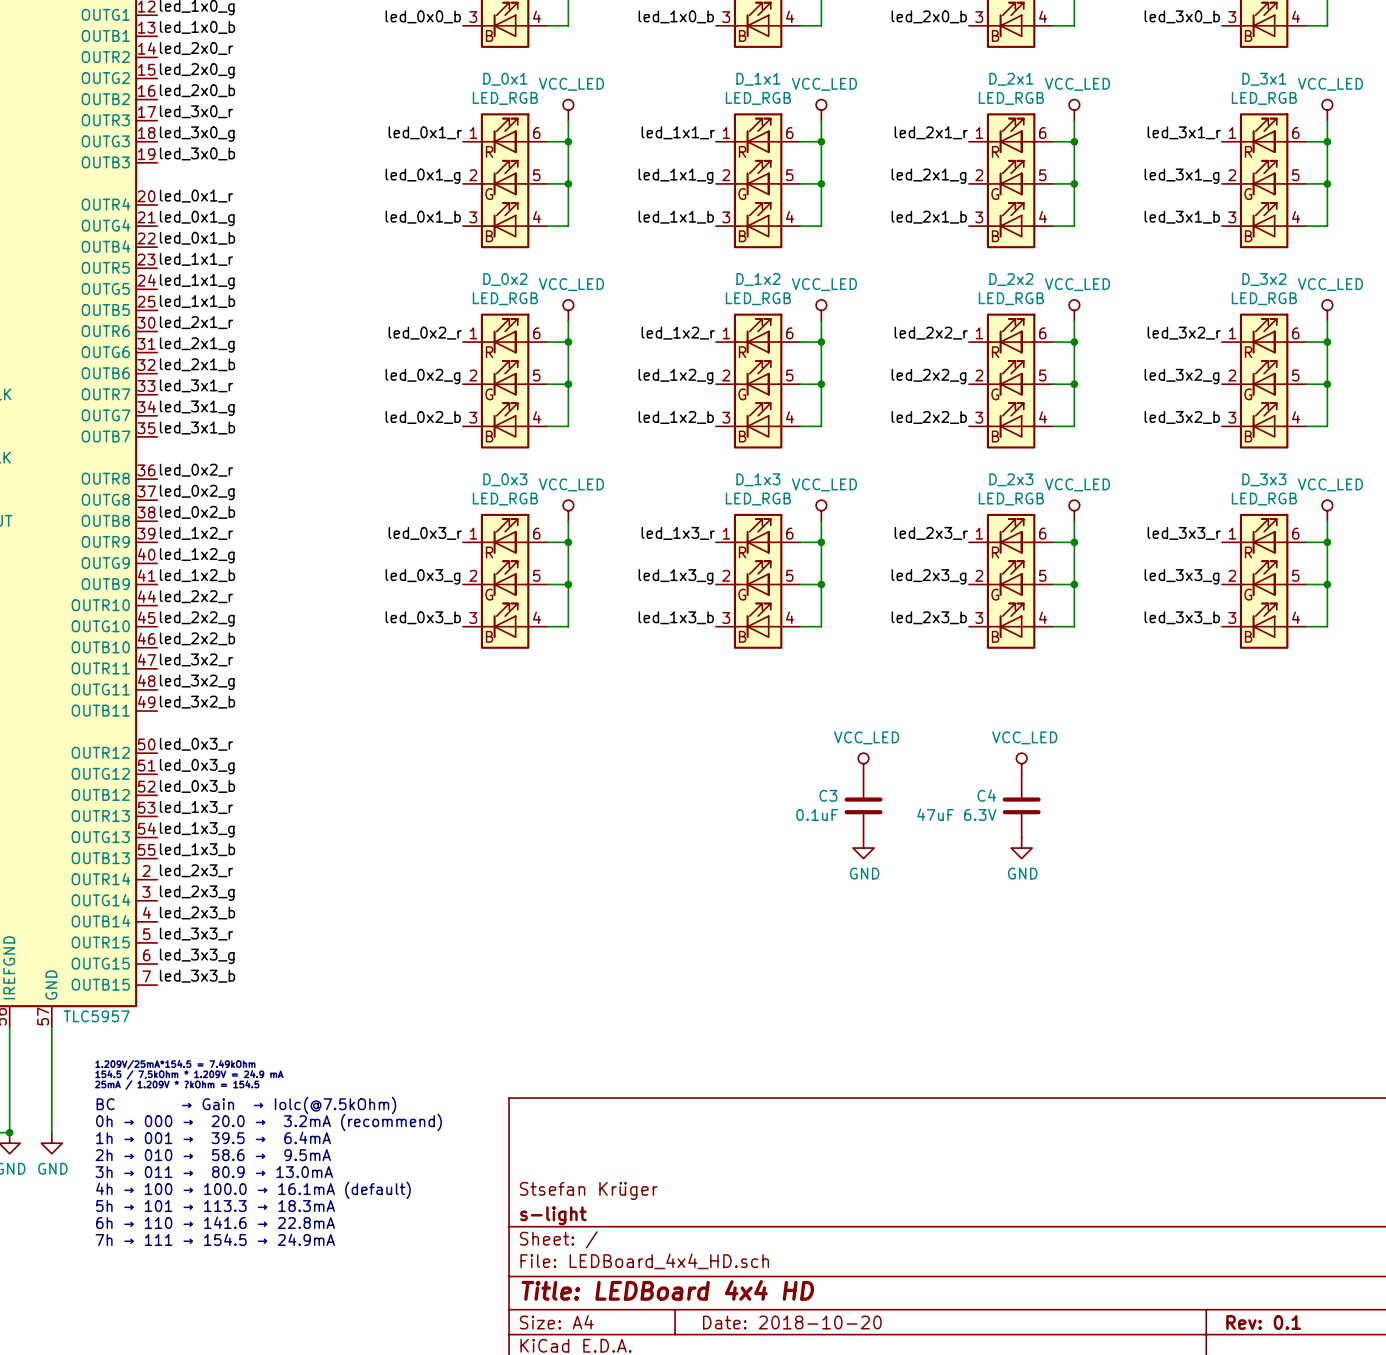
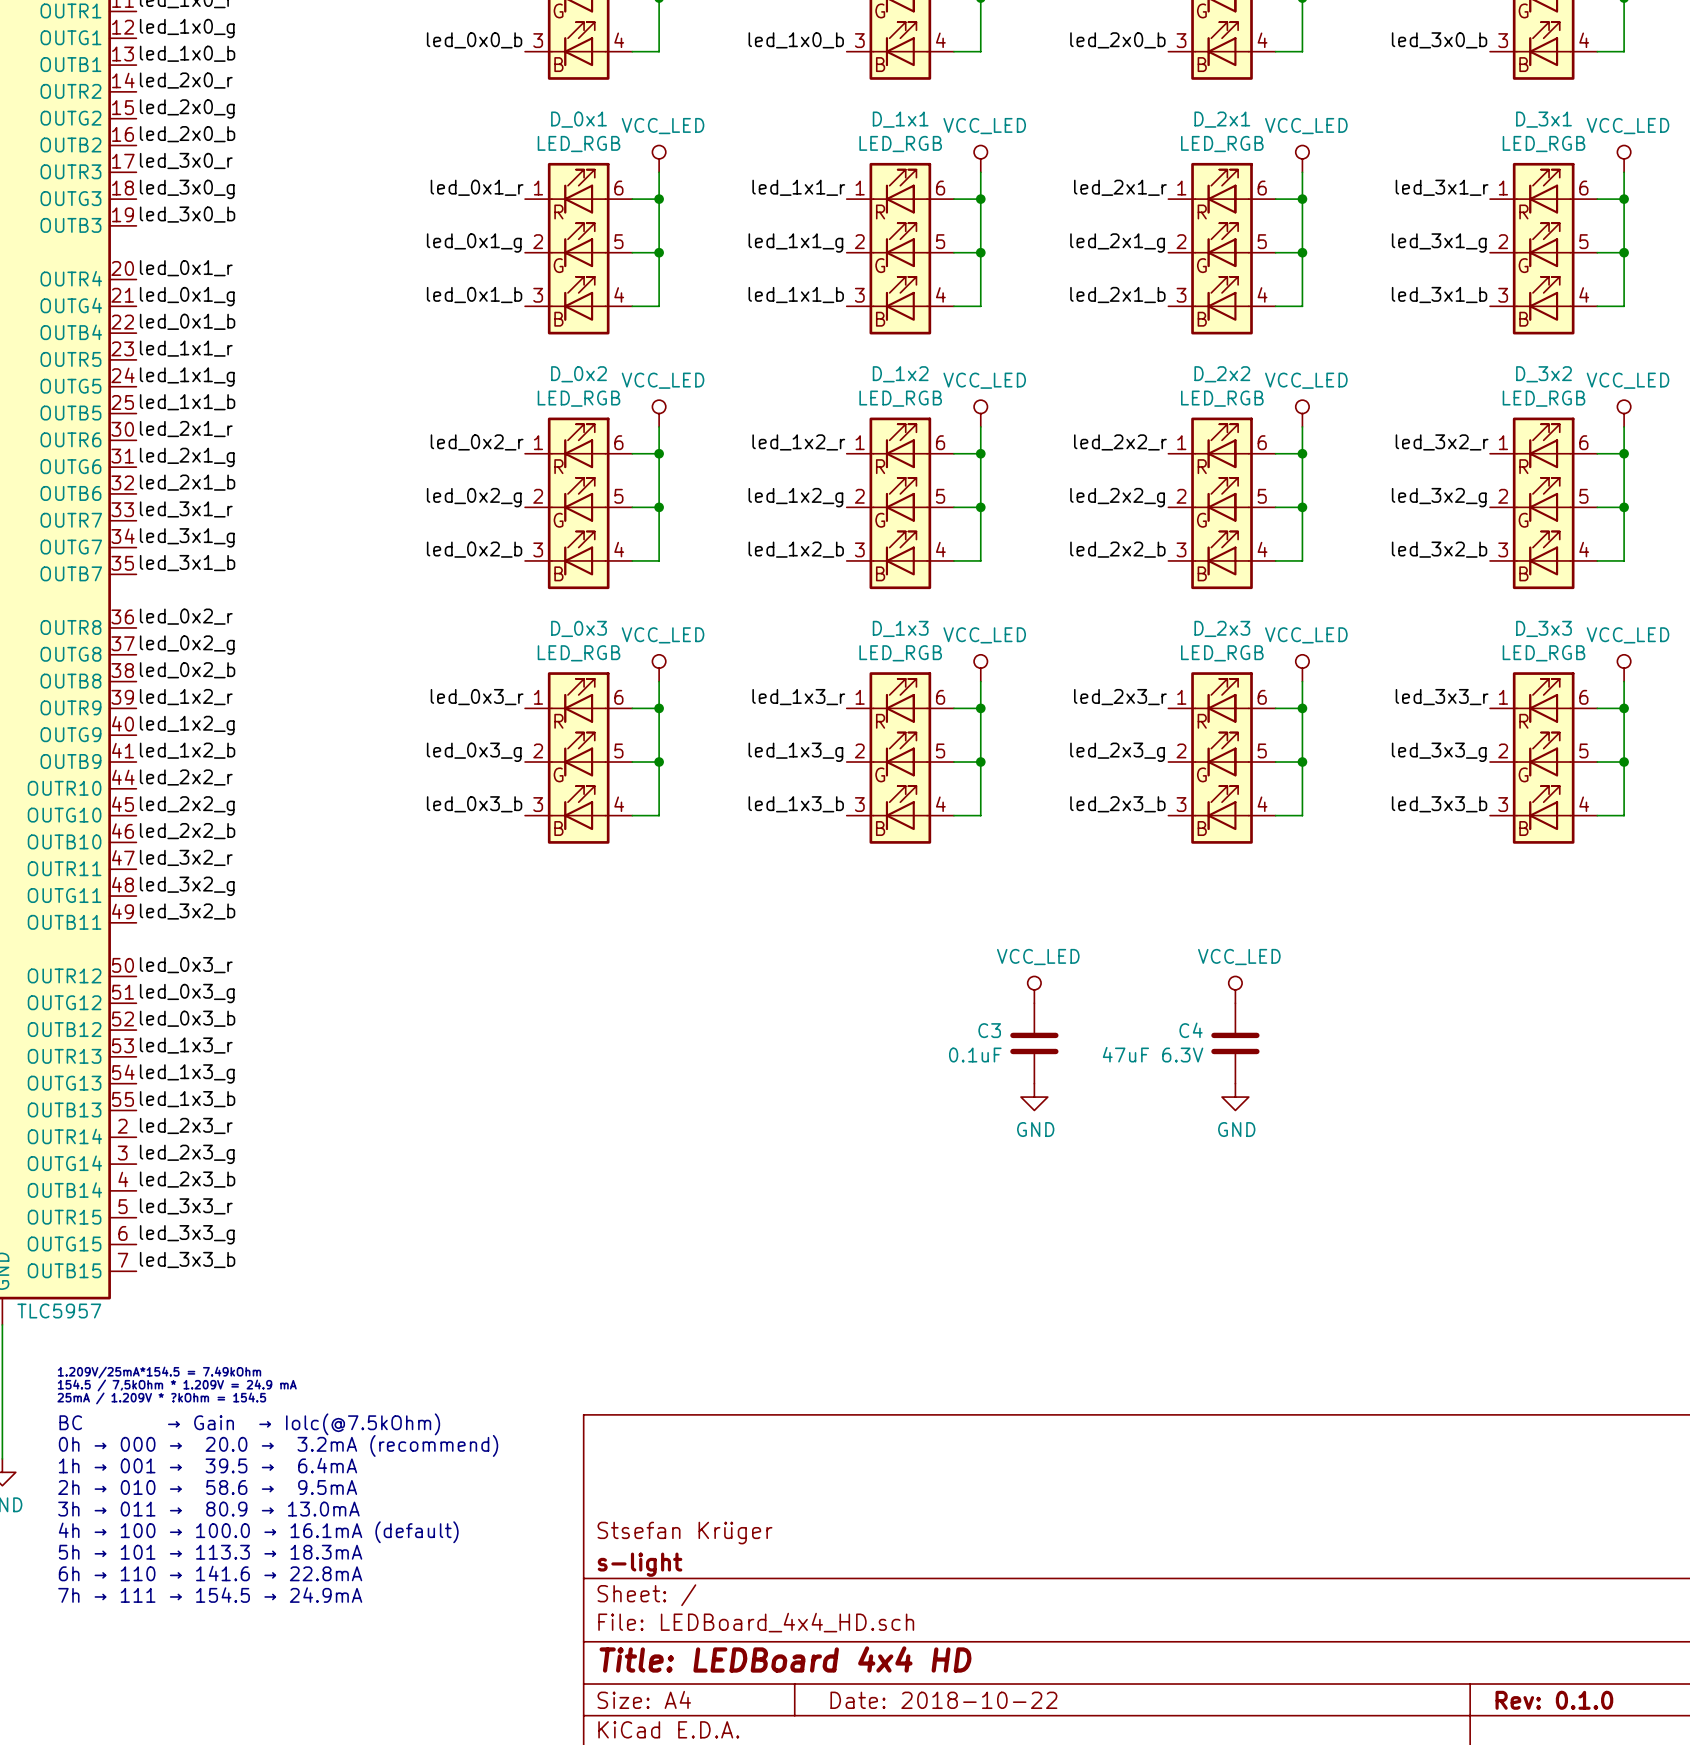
title block: Date: 2018-10-20 (792, 1322) -> Date: 2018-10-22 (943, 1700)
title block: Rev: 0.1 (1263, 1322) -> Rev: 0.1.0 (1554, 1700)

